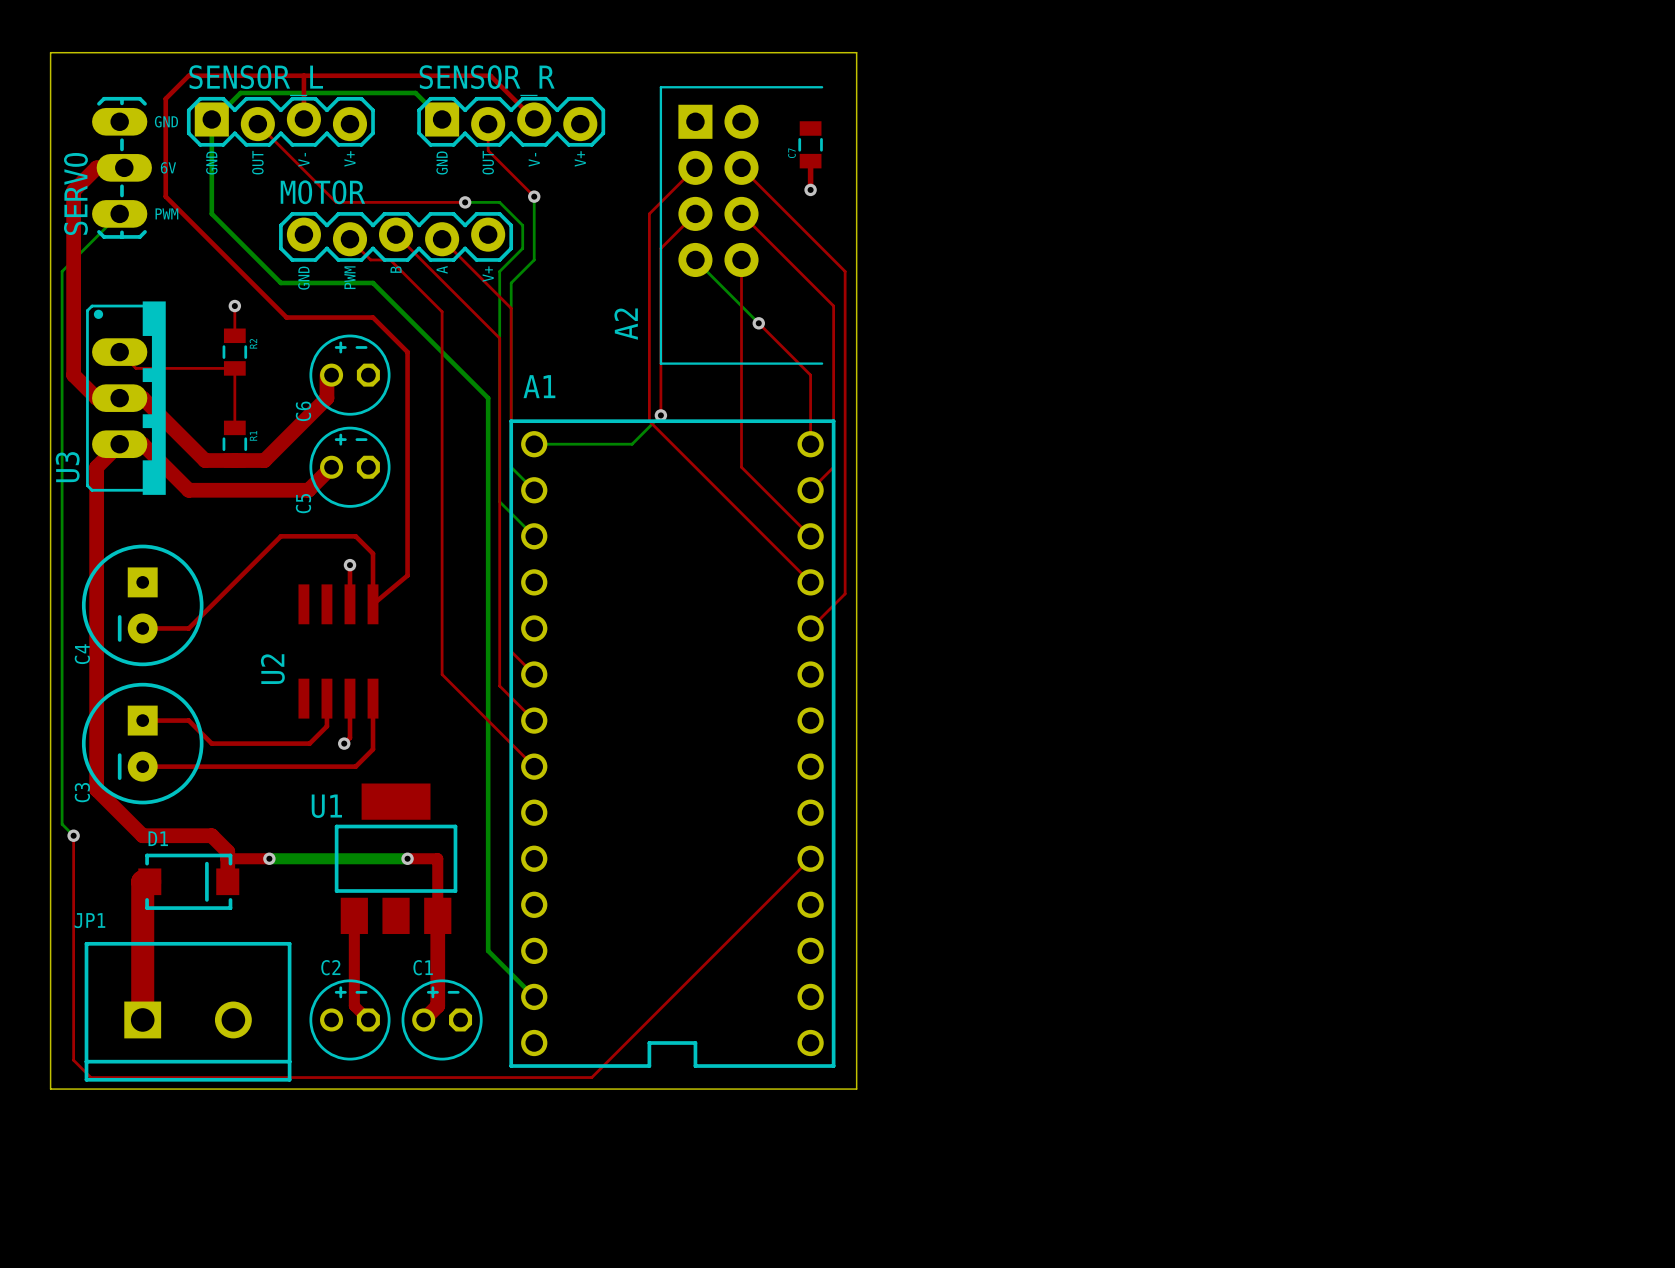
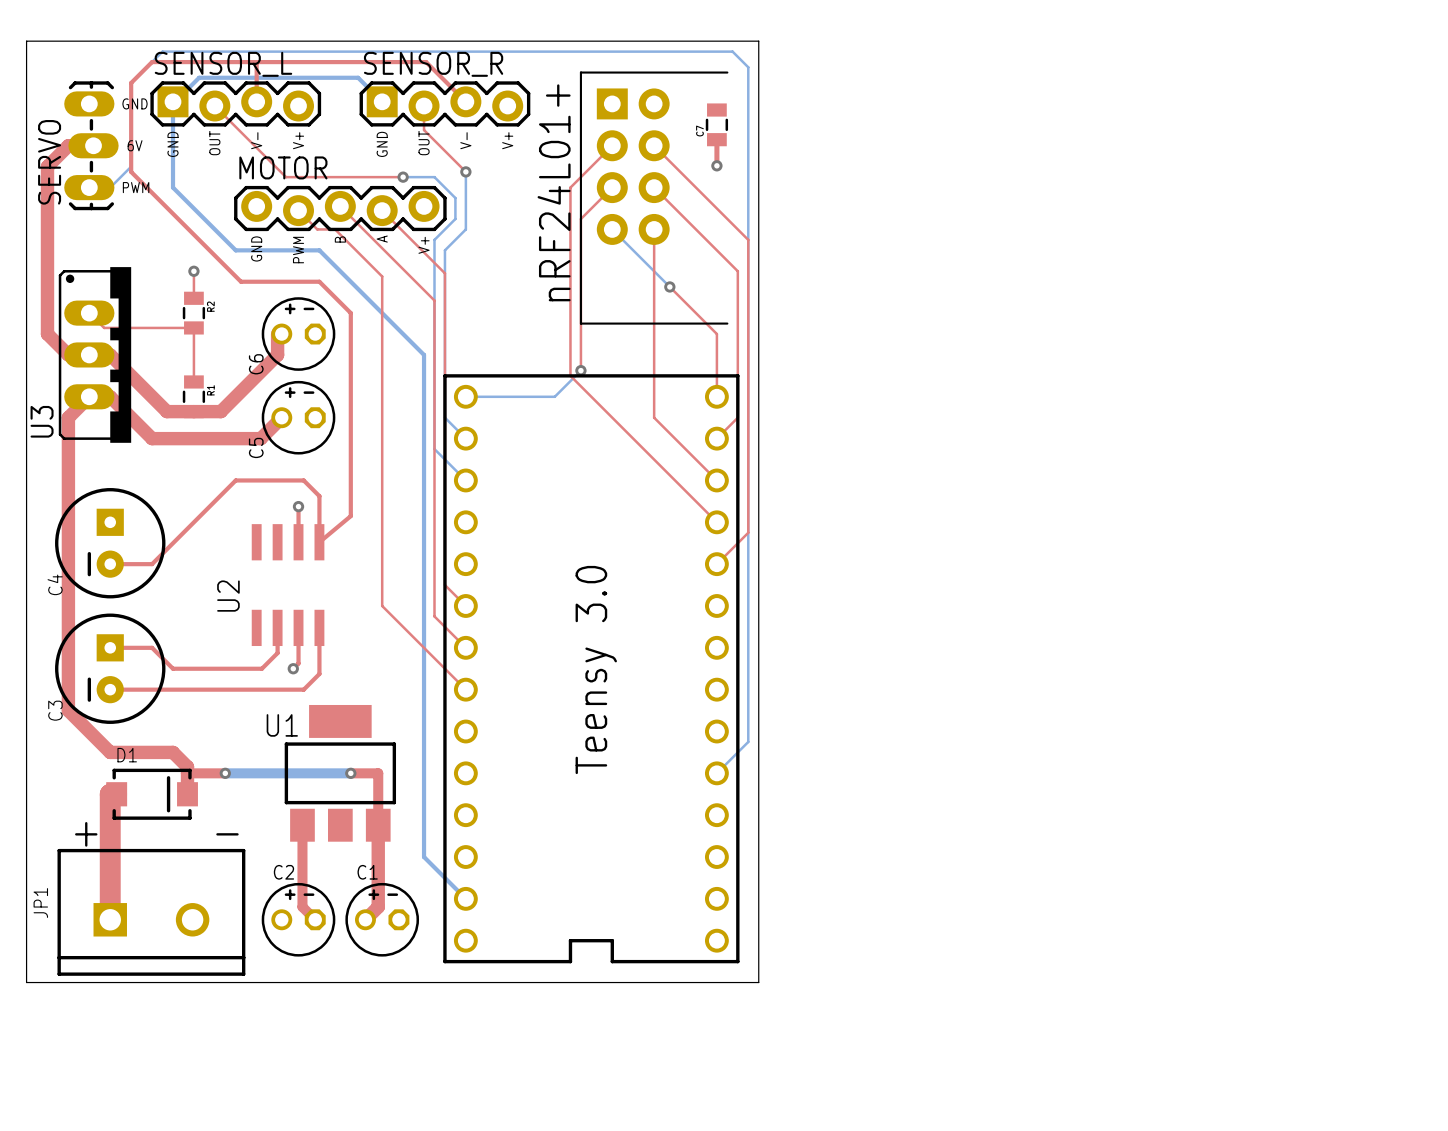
bottom track: (119, 213) (62, 271) (62, 824) (73, 835) -> (89, 187) (110, 187) (131, 166) (131, 83) (162, 51) (732, 51) (748, 67) (748, 741) (716, 773)
text: none -> nRF24L01+ (554, 192)
A2 name: A2 (626, 324) -> none
A1 name: A1 (539, 386) -> none
text: none -> Teensy 3.0 (596, 670)
top track: (73, 835) (73, 1060) (90, 1077) (591, 1077) (810, 858) -> none
via: (73, 835) -> none
JP1 name rotation: 0° (89, 920) -> 90° counterclockwise (40, 903)
JP1 name position: JP1 (89, 920) -> JP1 (40, 903)
text: none -> + (86, 834)
text: none -> - (227, 834)

